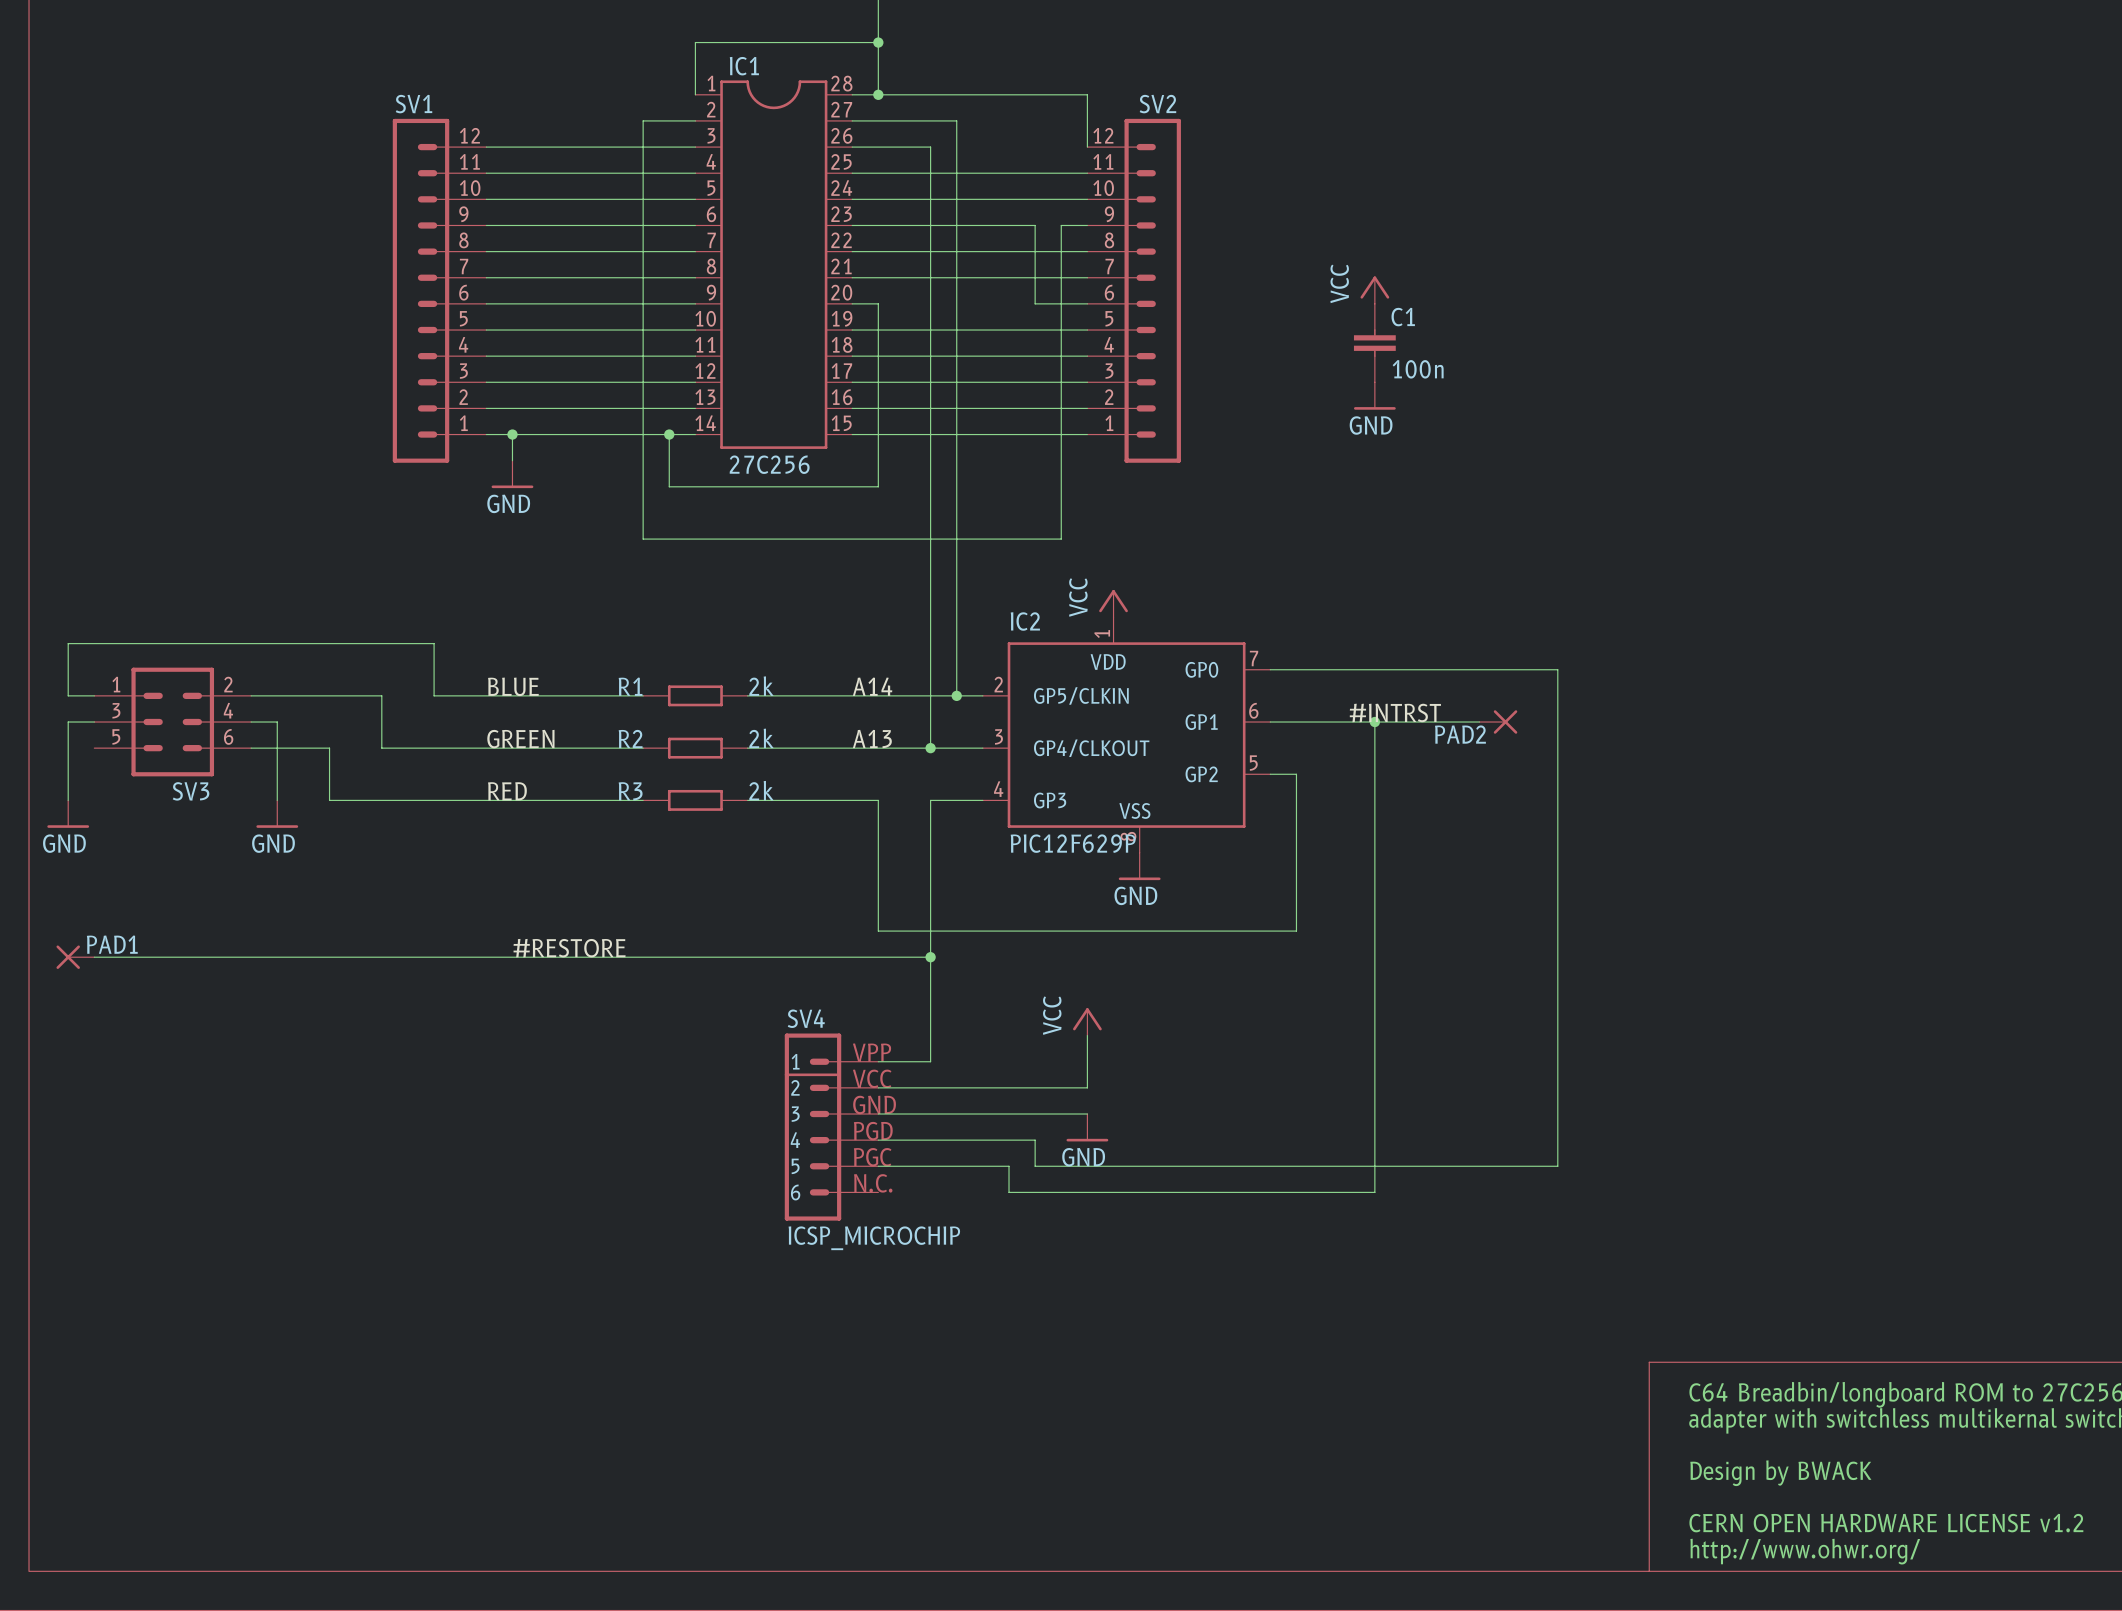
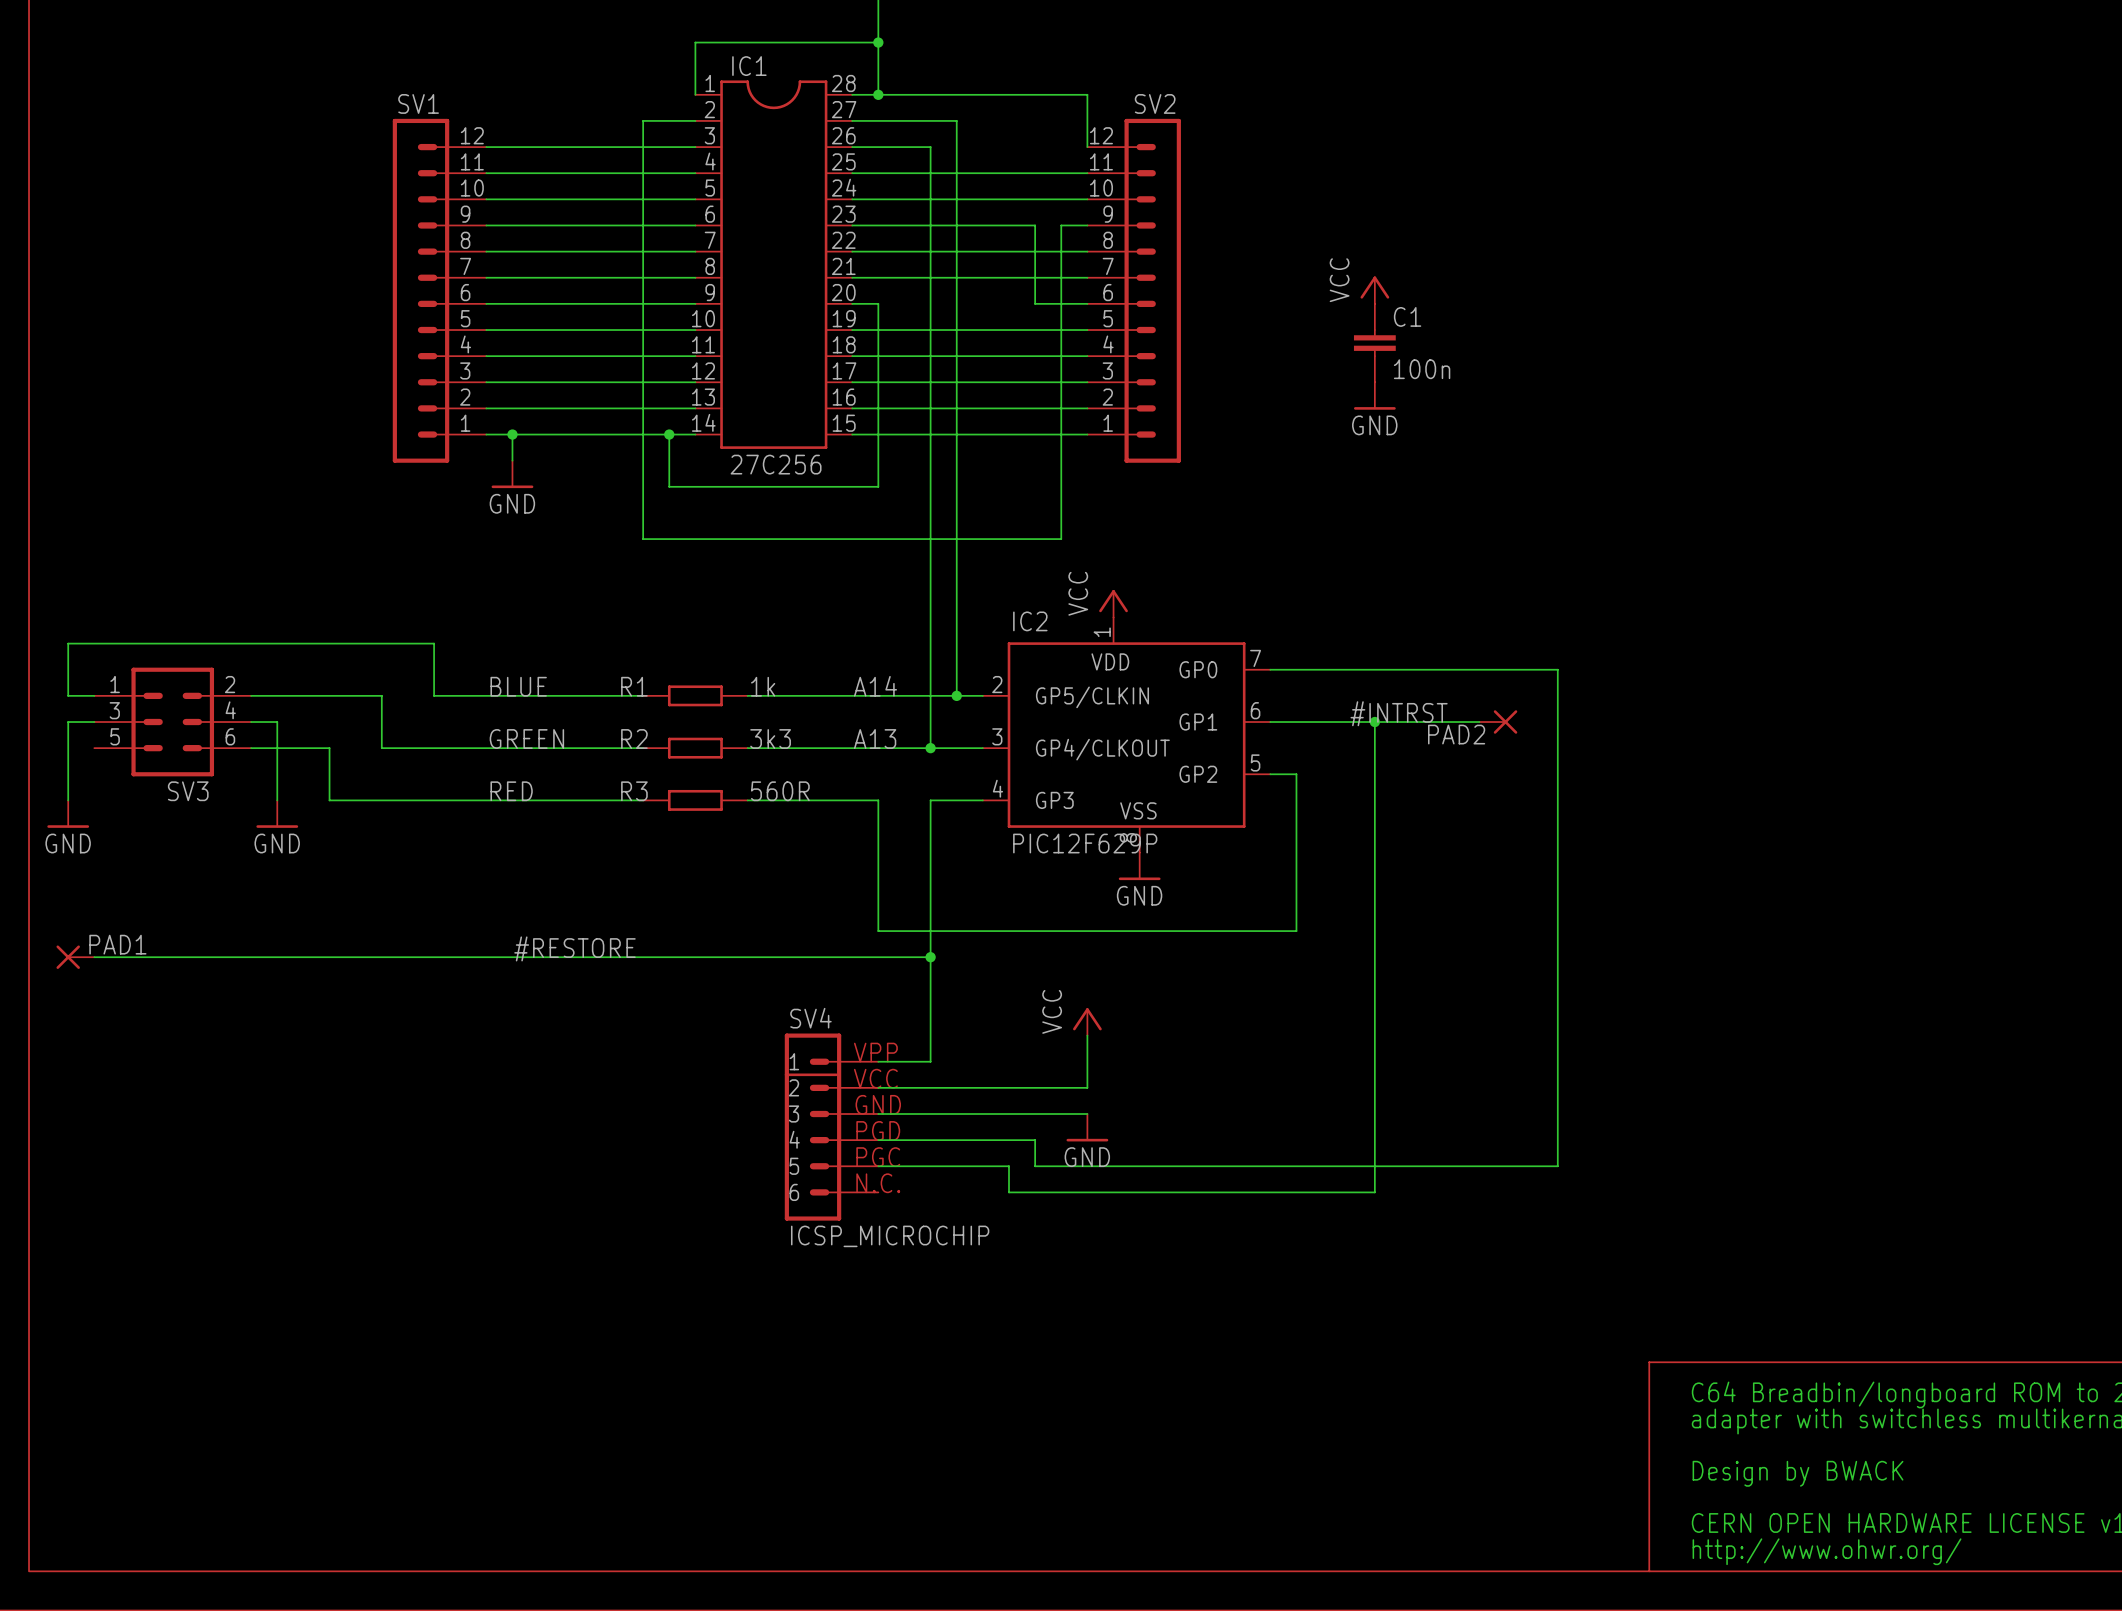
R1 value: 2k (761, 686) -> 1k (763, 686)
R2 value: 2k (761, 738) -> 3k3 (770, 738)
R3 value: 2k (761, 790) -> 560R (780, 791)

